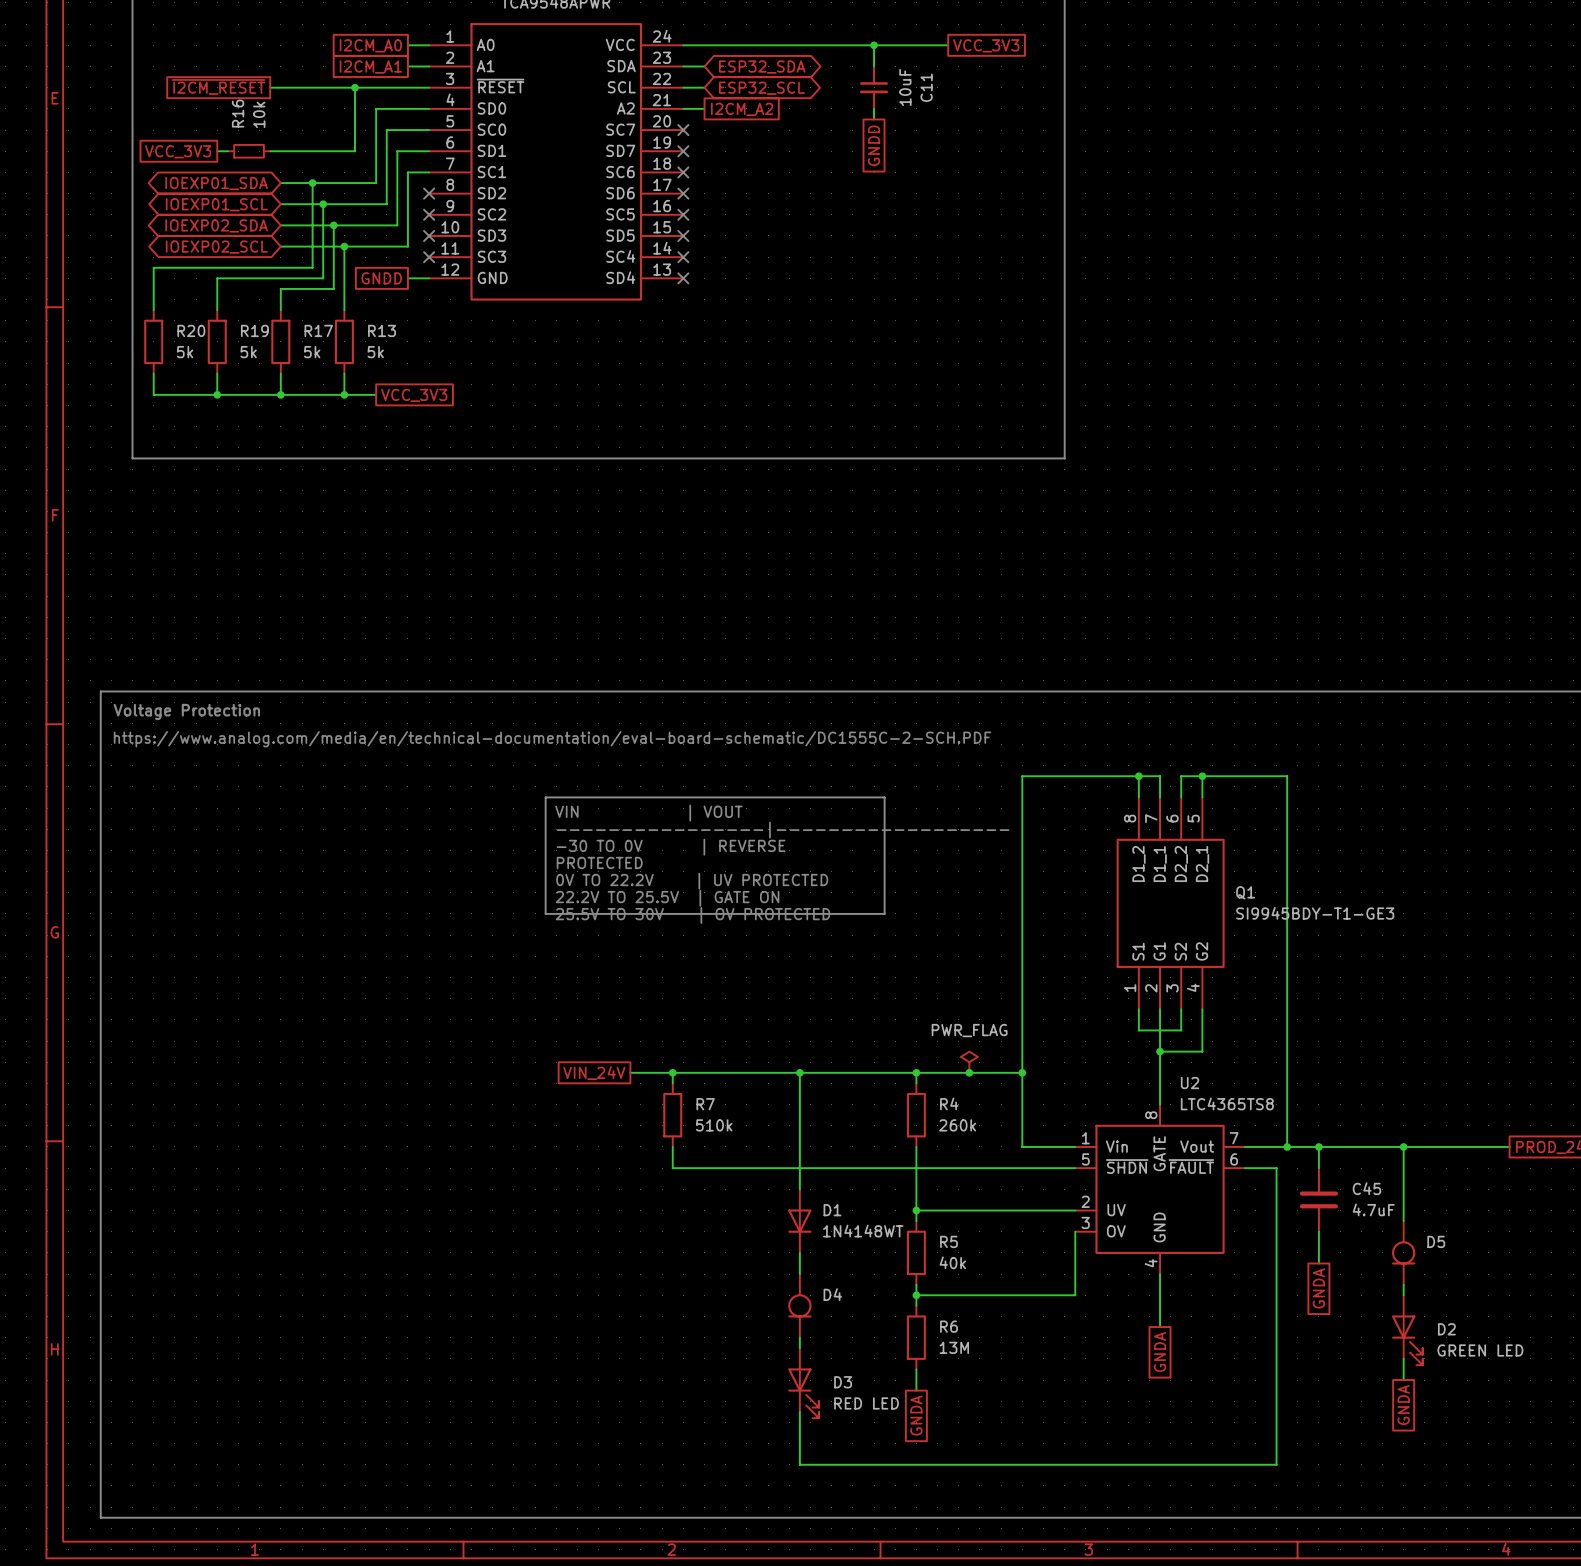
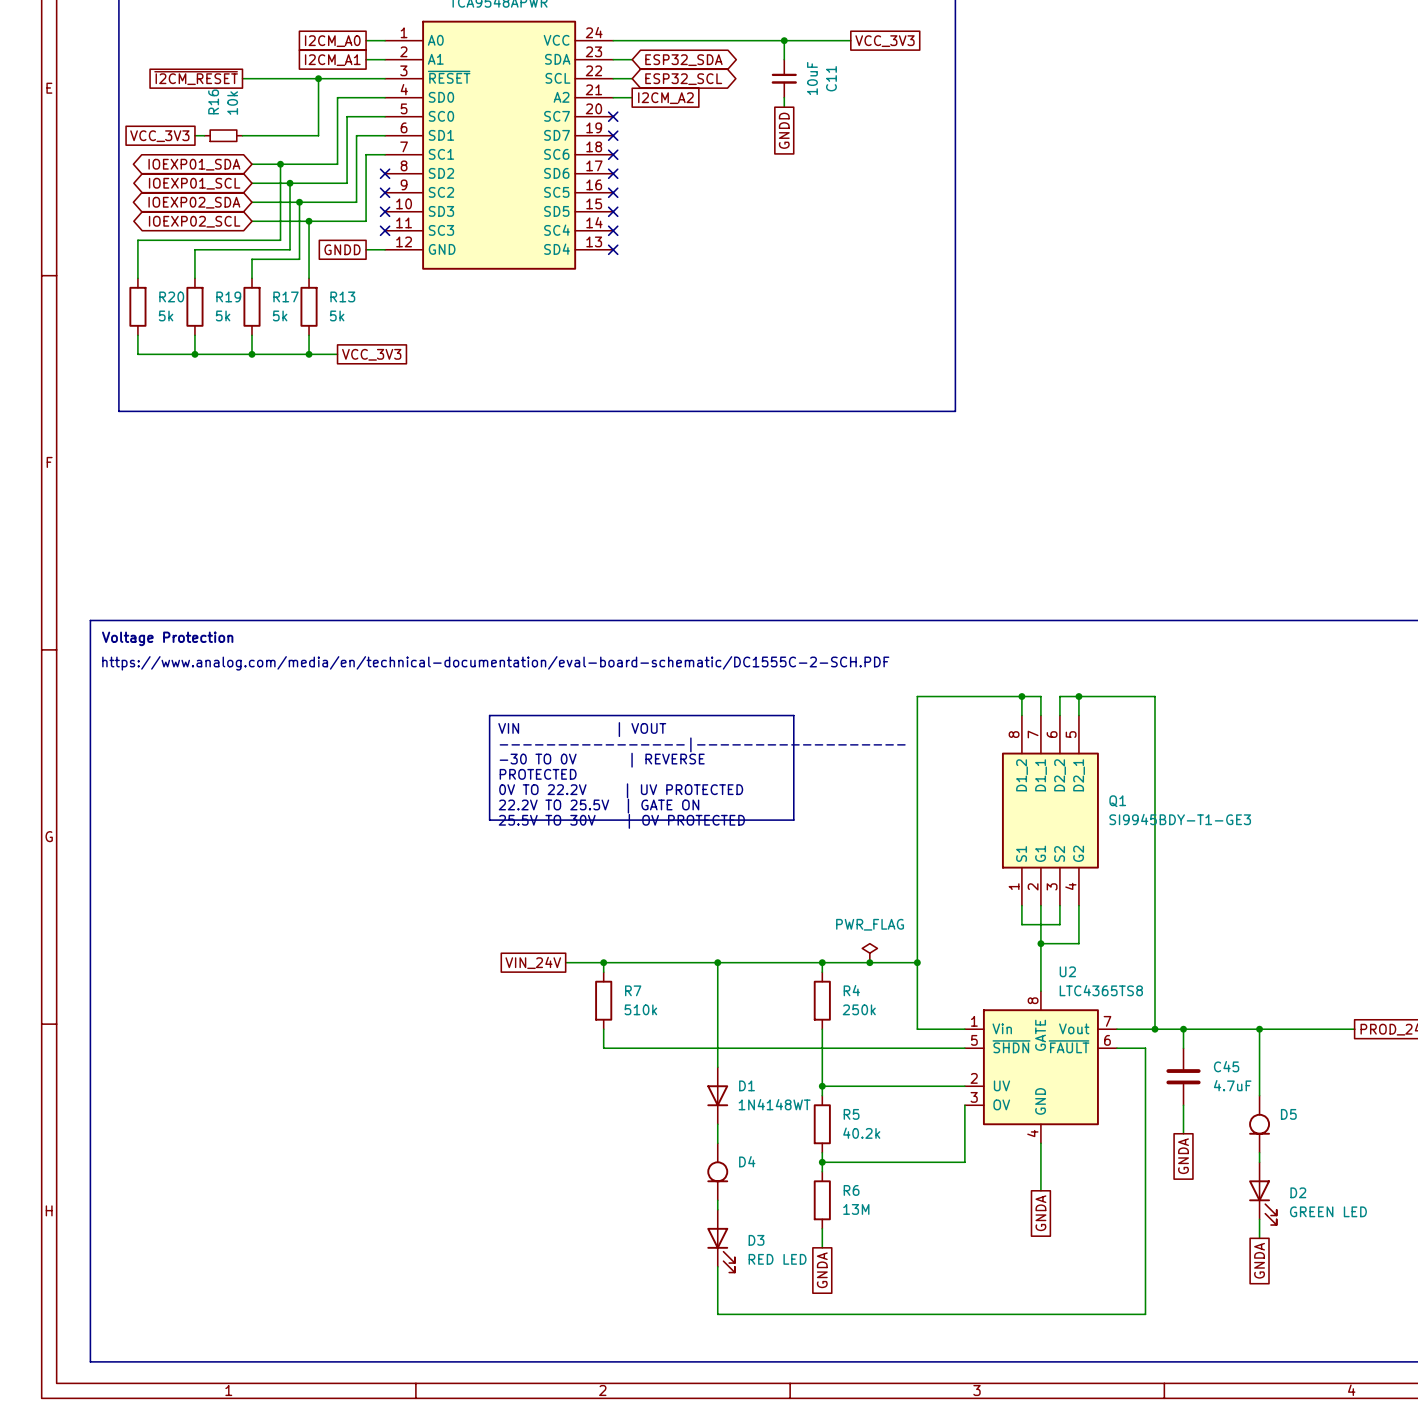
R4 value: 260k (957, 1125) -> 250k (859, 1009)
R5 value: 40k (952, 1262) -> 40.2k (861, 1133)

